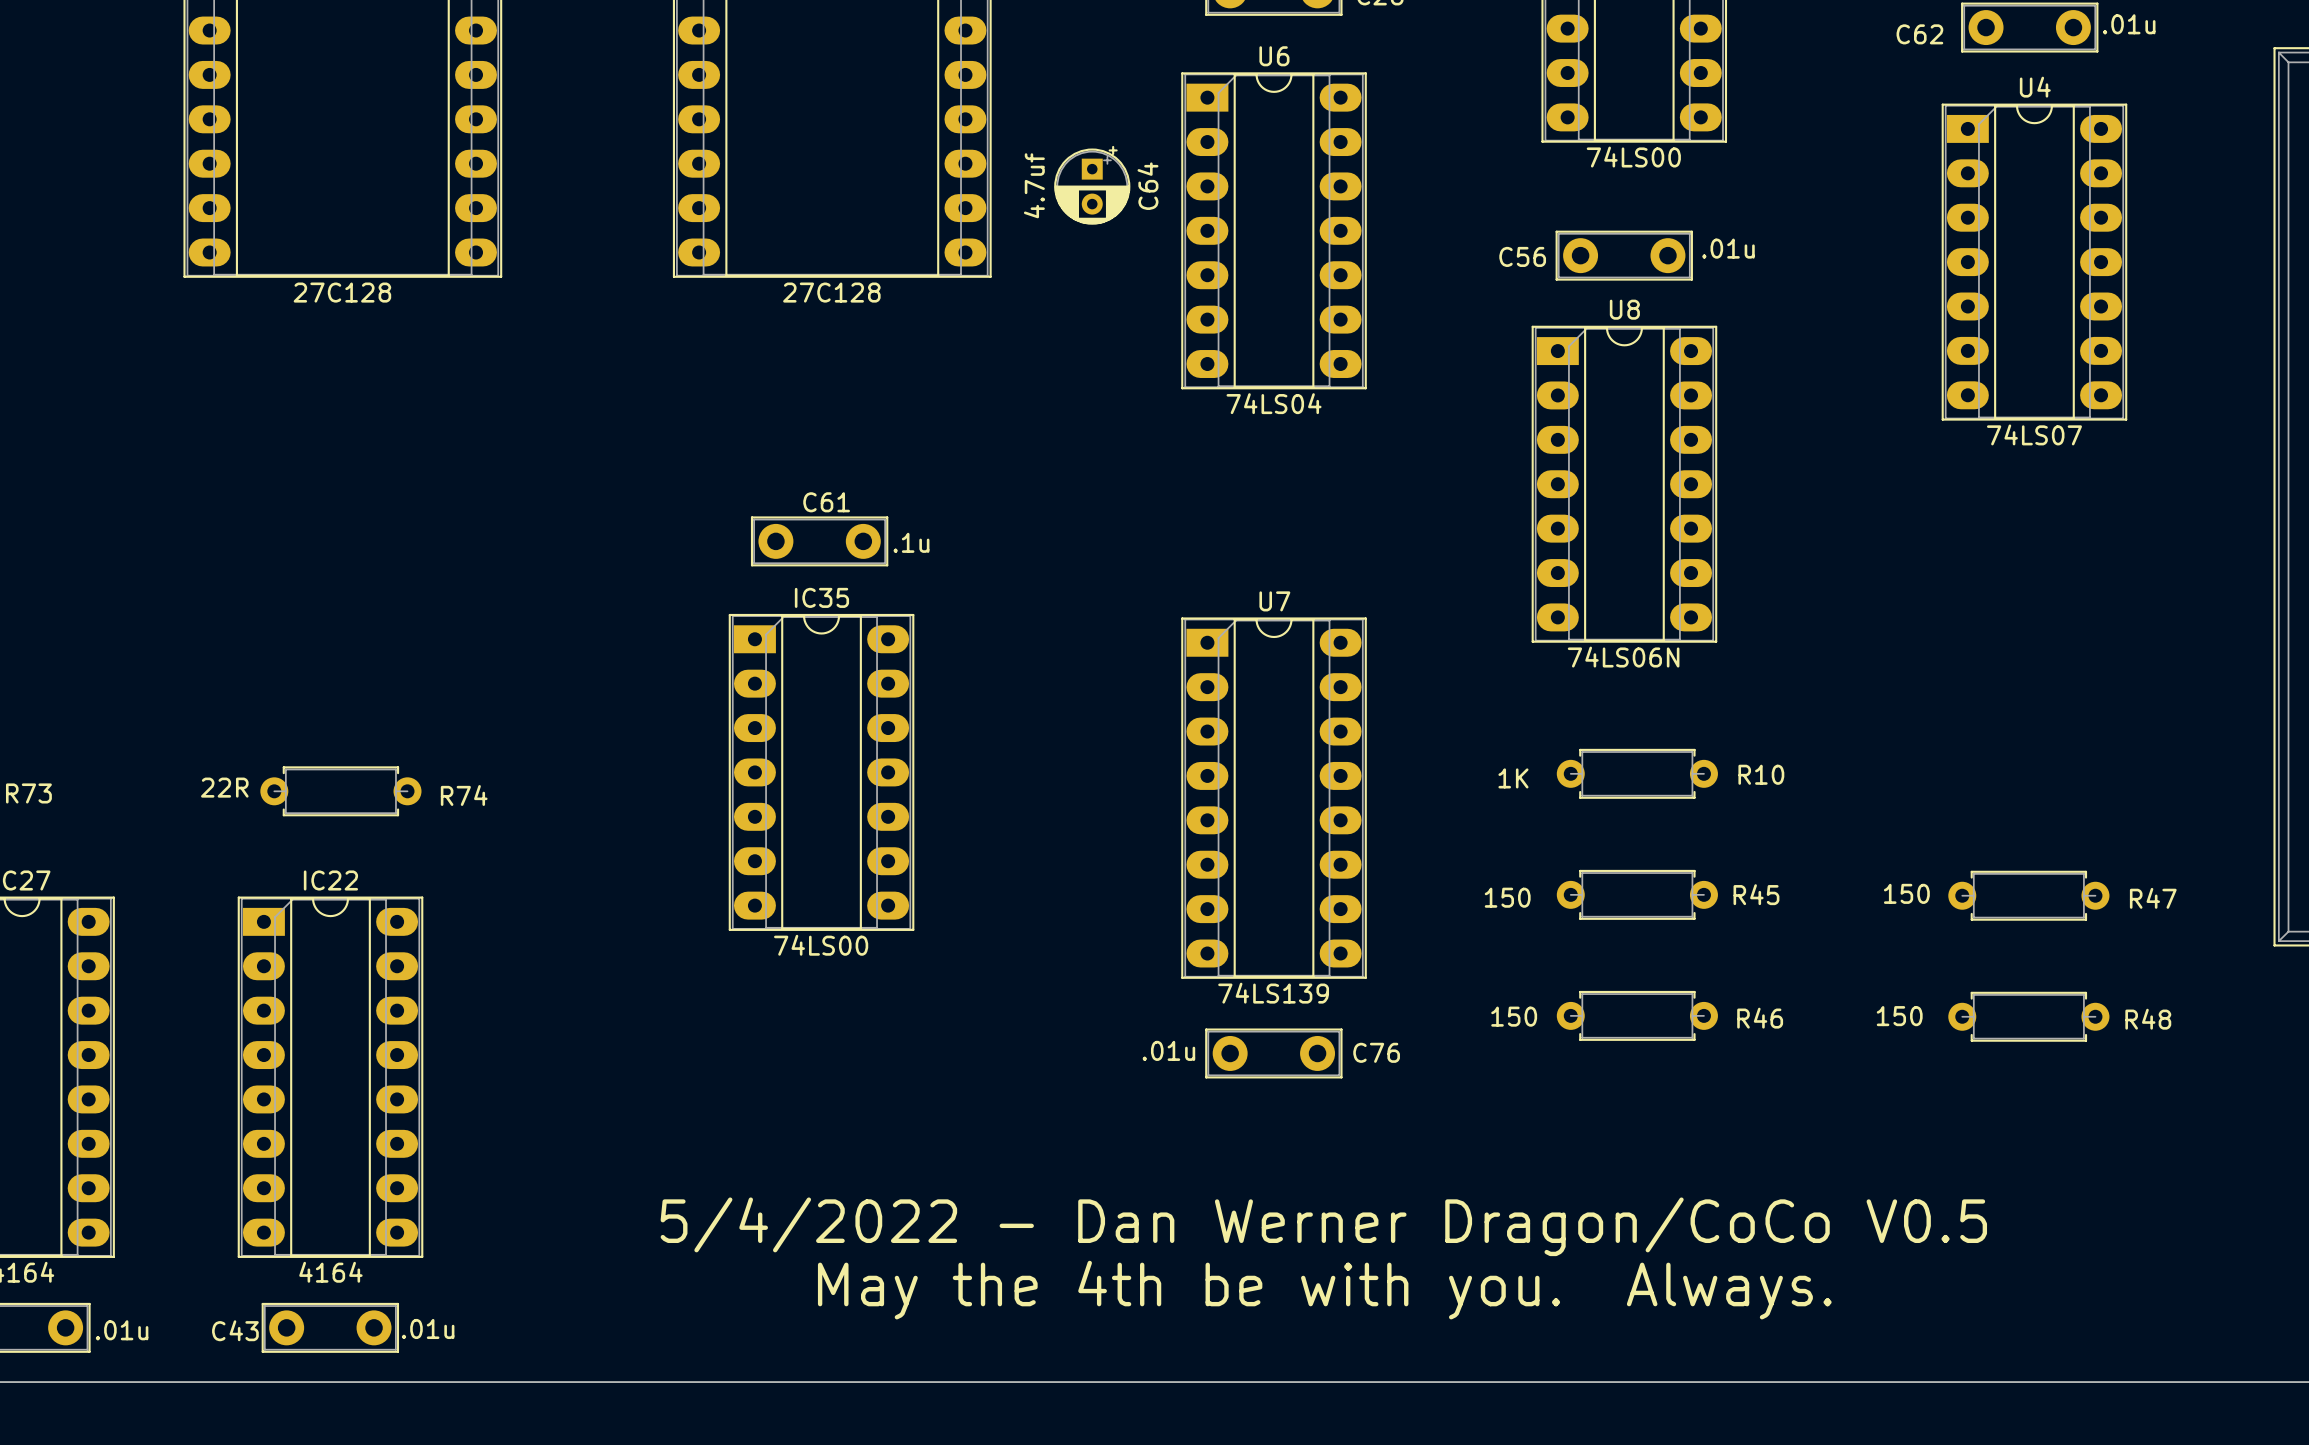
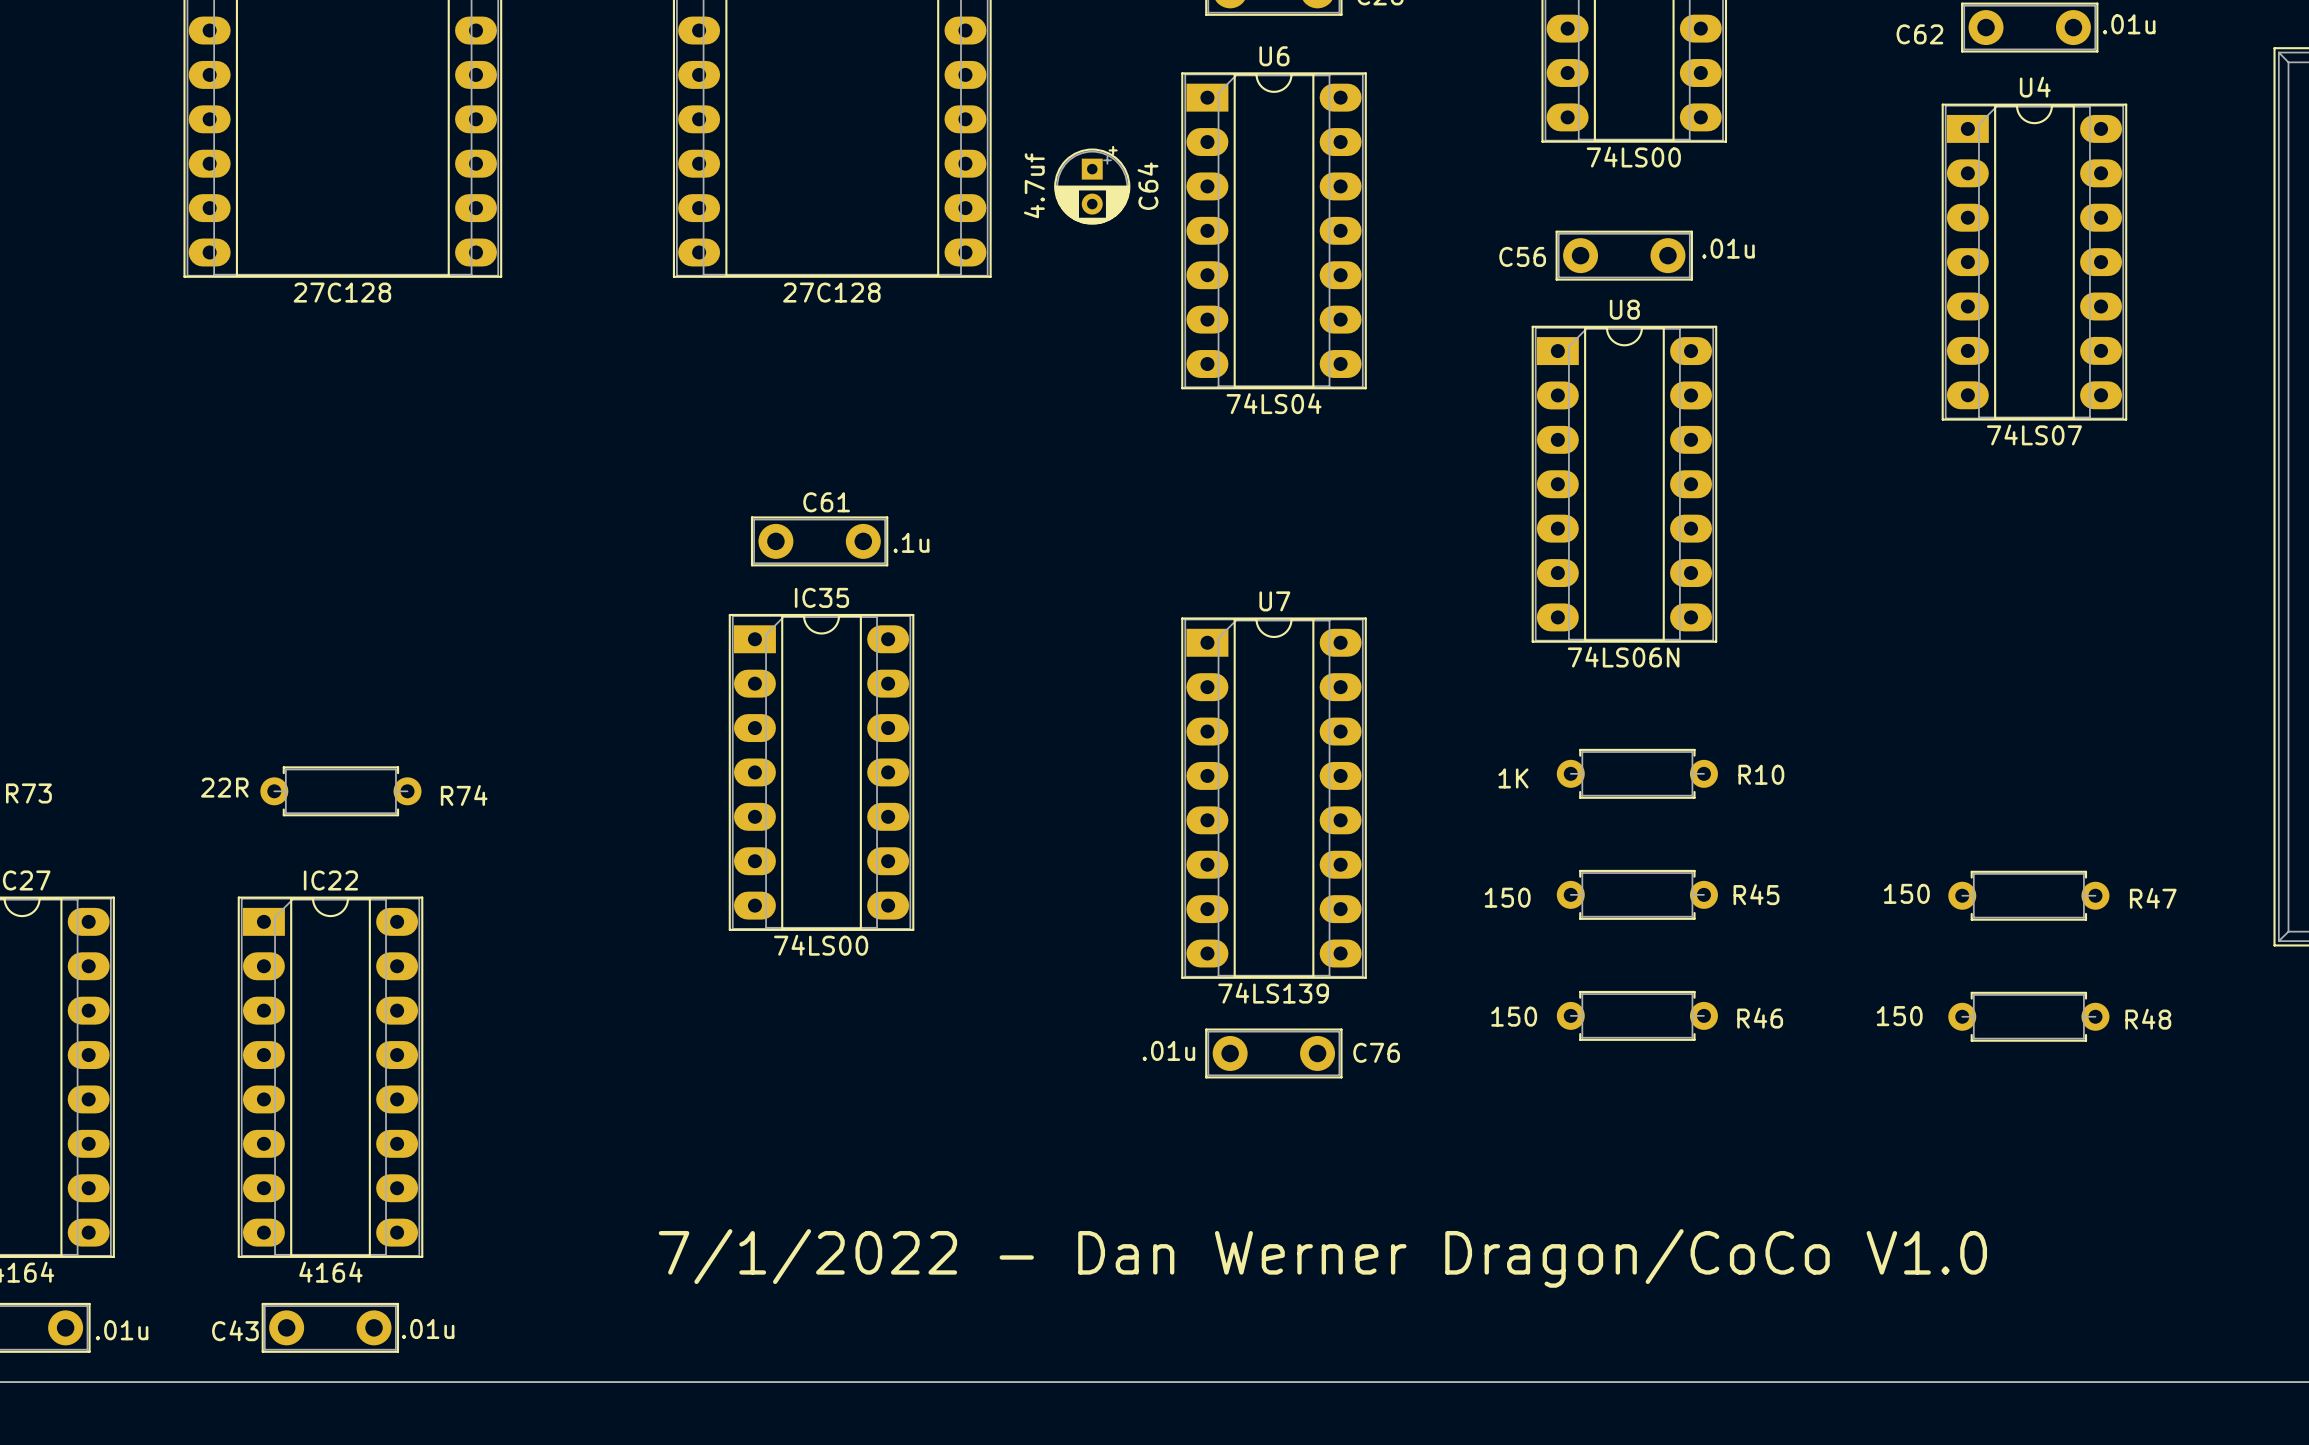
text: 5/4/2022 - Dan Werner Dragon/CoCo V0.5 (1323, 1226) -> 7/1/2022 - Dan Werner Dragon/CoCo V1.0 (1322, 1258)
text: May the 4th be with you. Always. (1324, 1290) -> none

